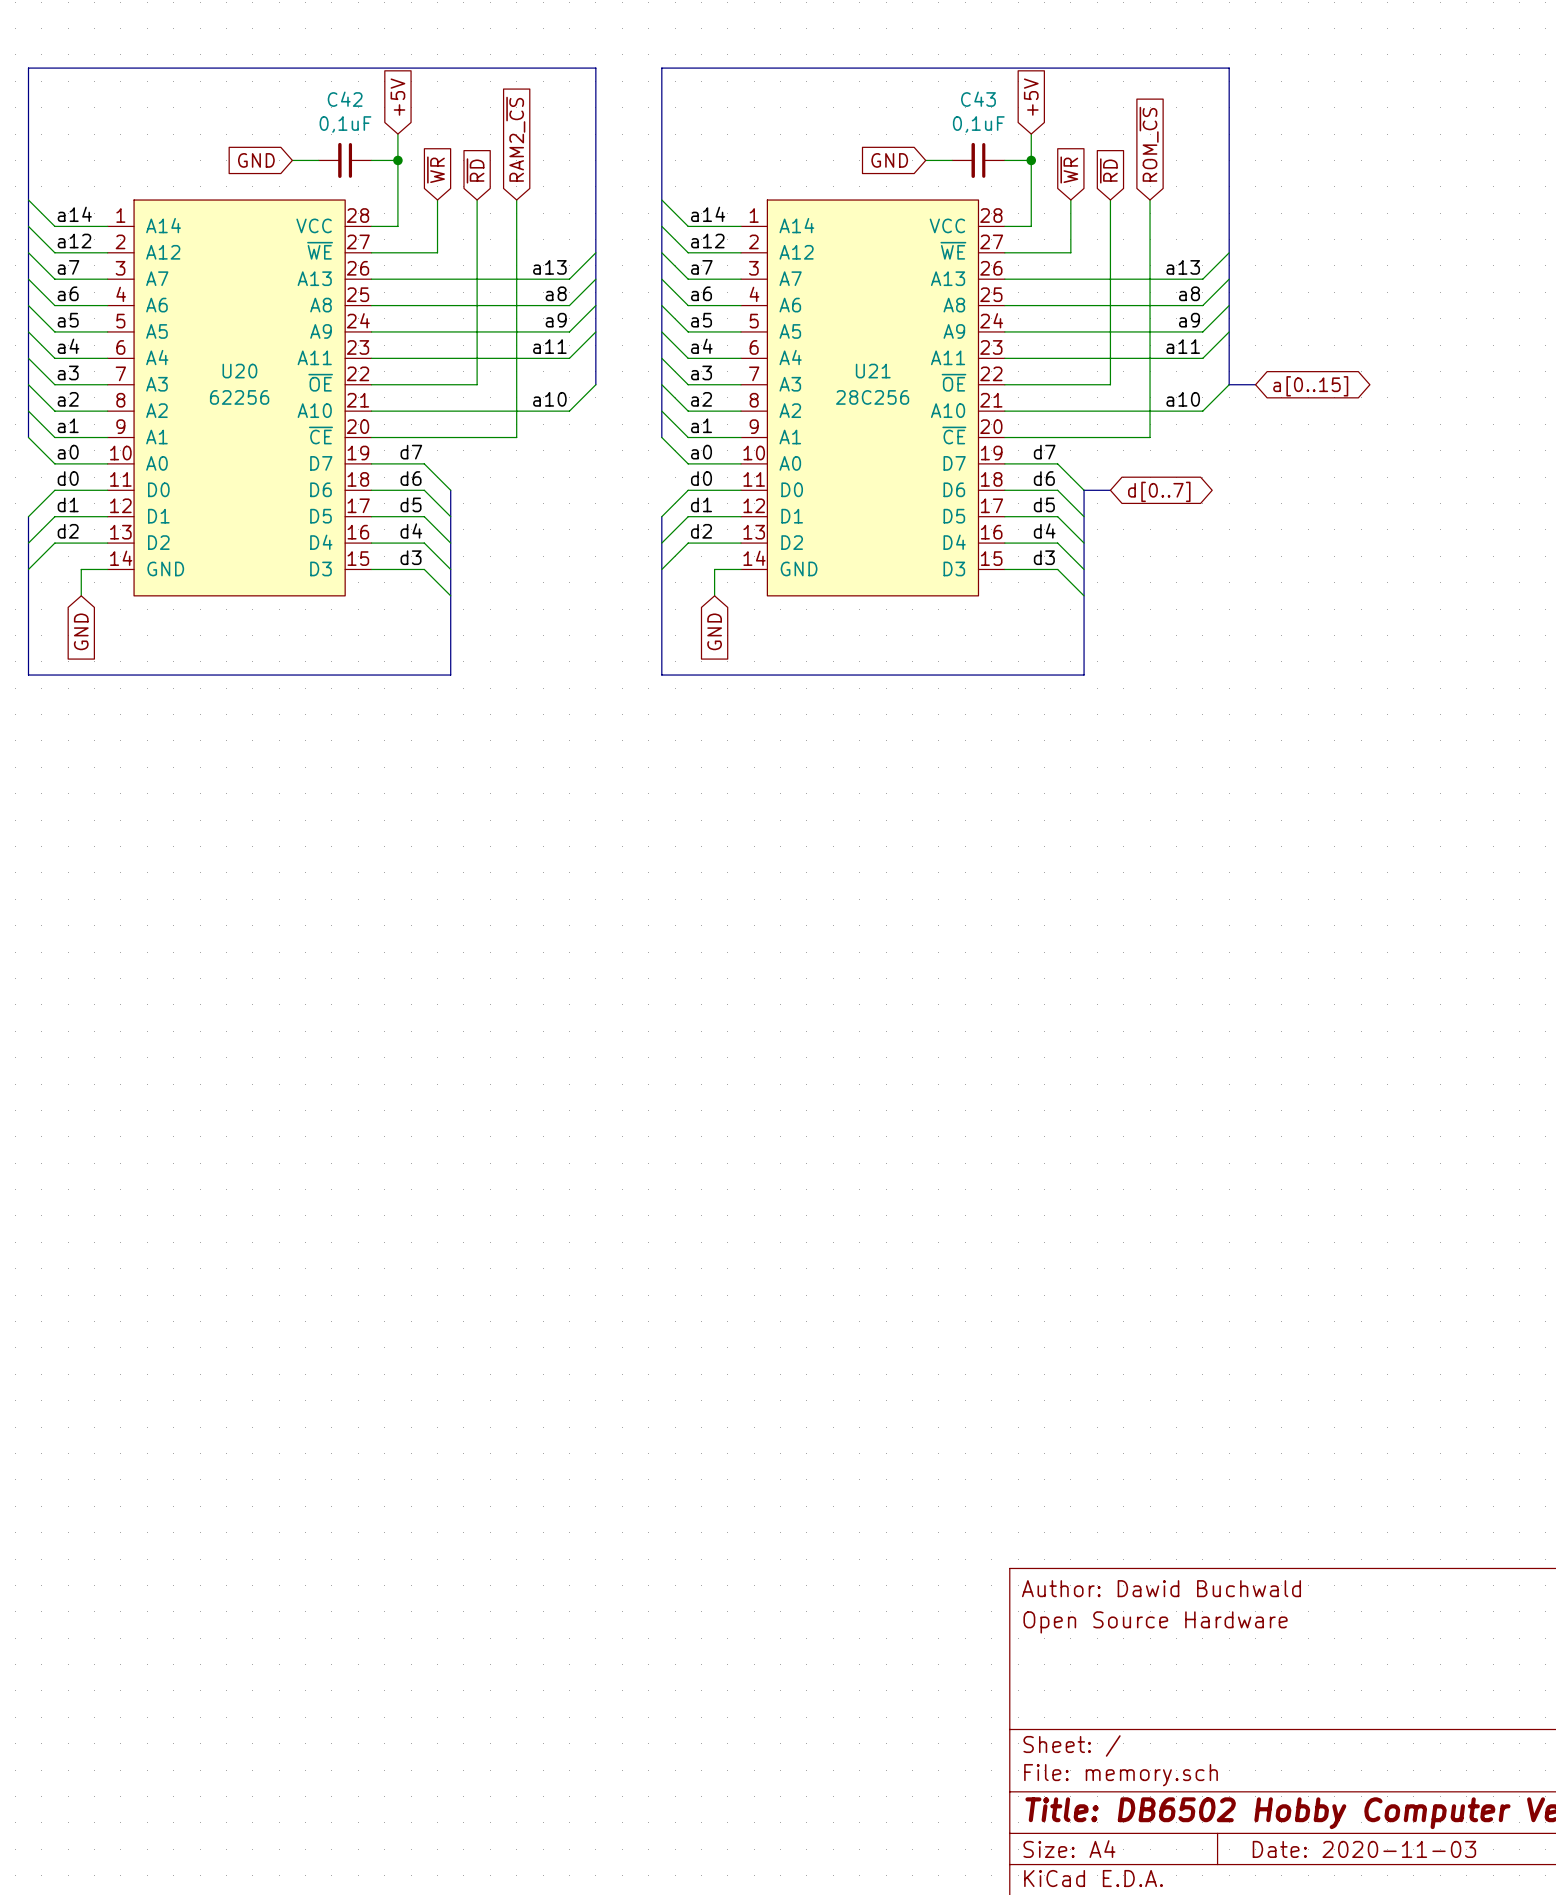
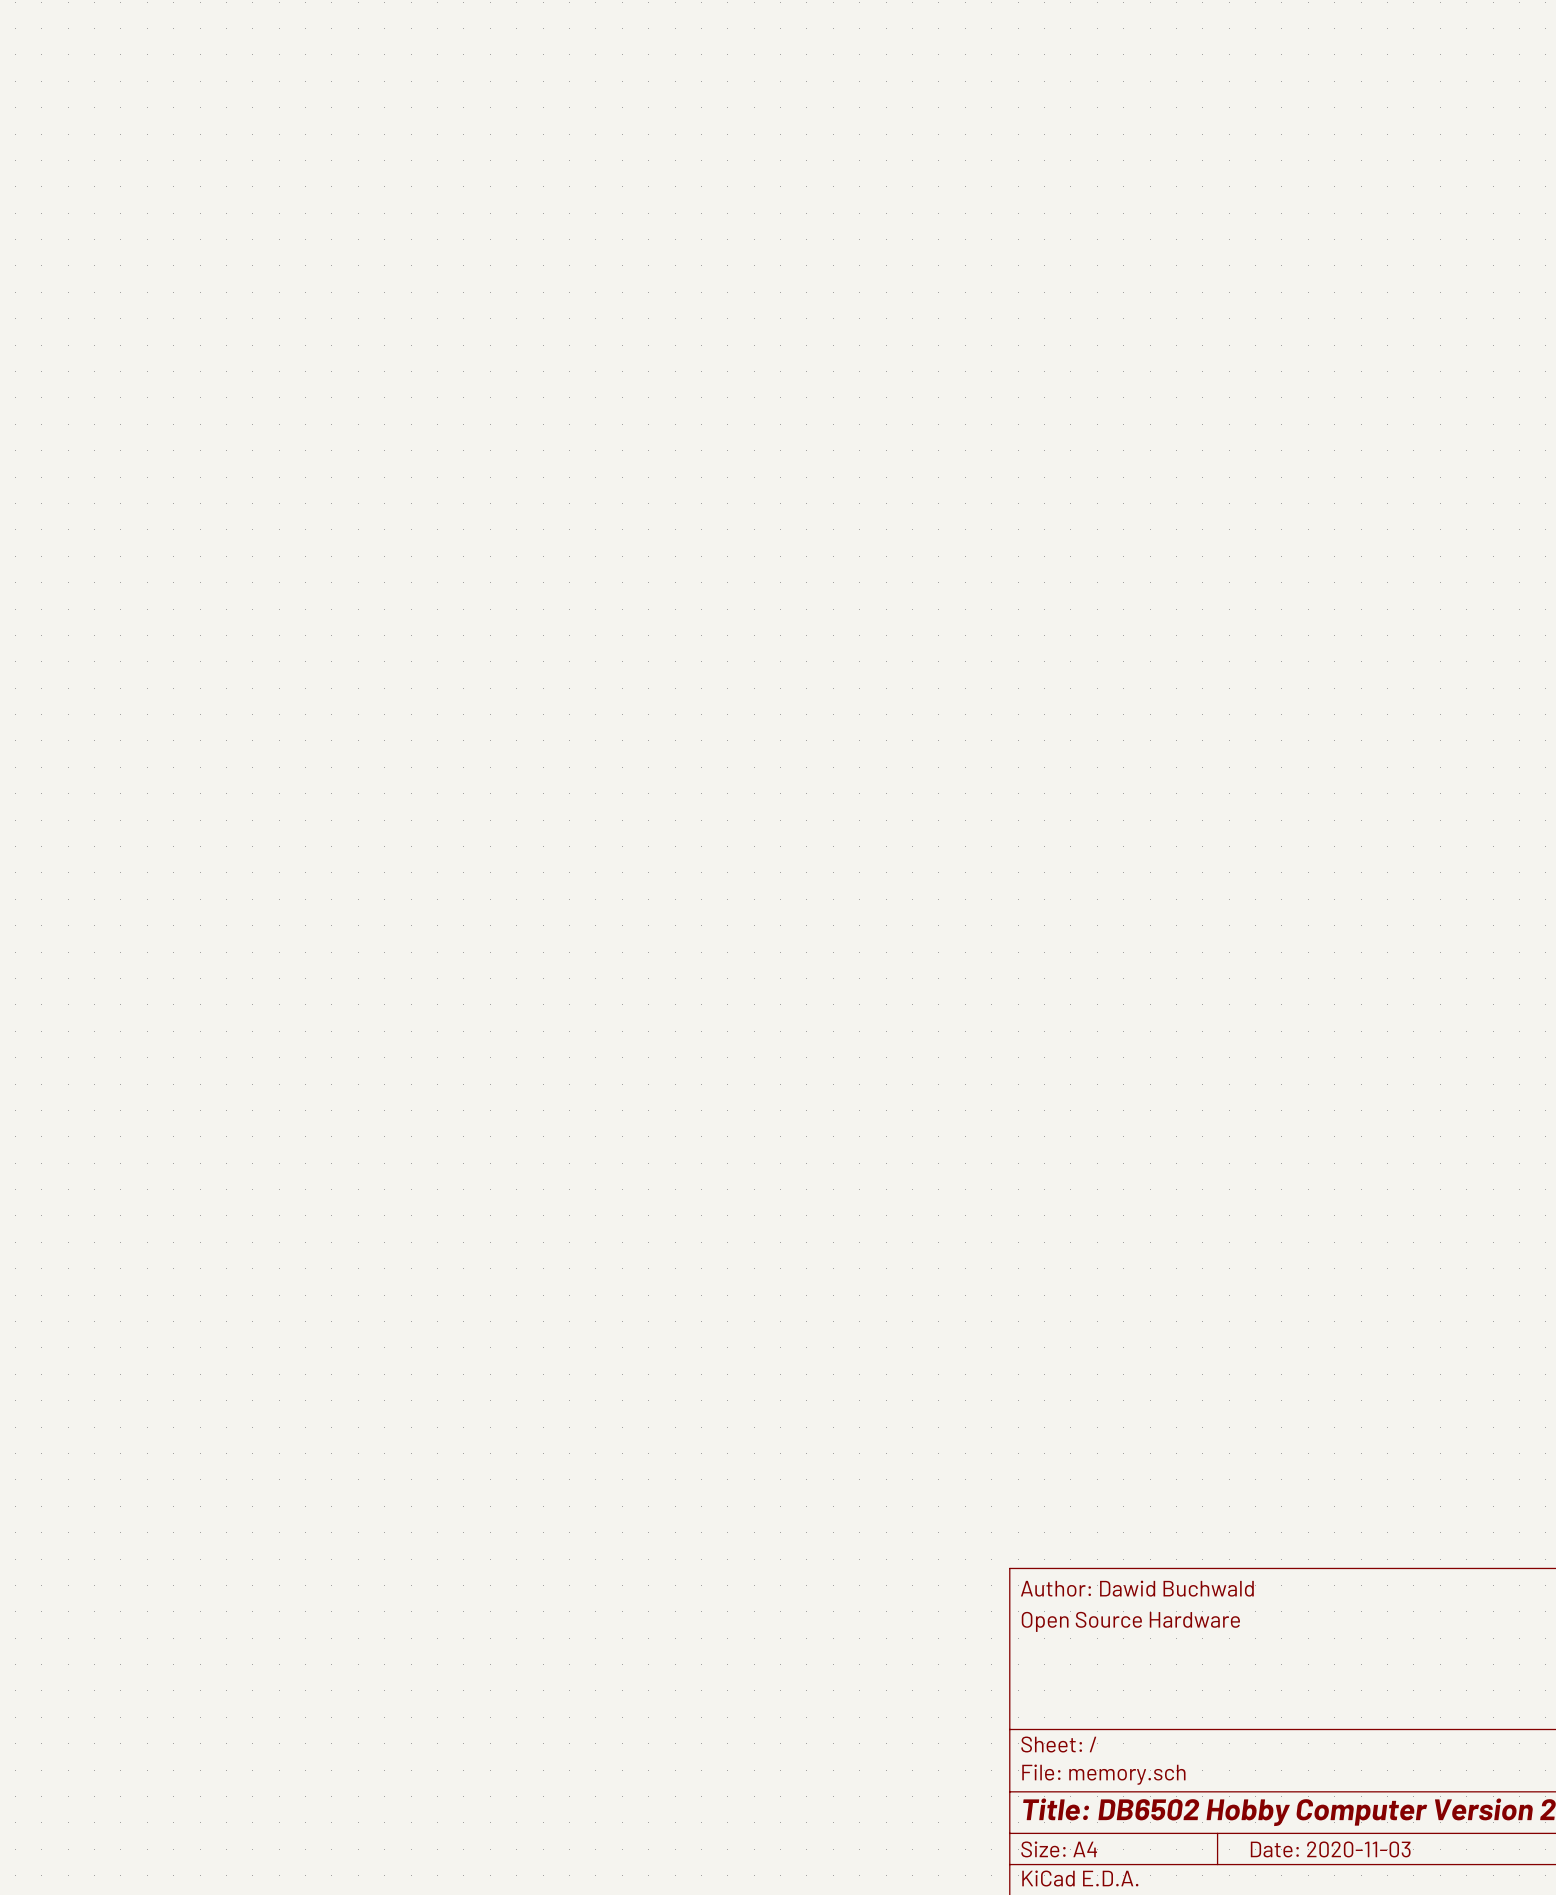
global label: +5V (397, 97) -> none
global label: +5V (1031, 97) -> none
wire: (397, 134) (397, 226) (371, 226) -> none
wire: (1031, 134) (1031, 226) (1004, 226) -> none
global label: RAM2_~{CS} (515, 139) -> none
global label: ROM_~{CS} (1149, 144) -> none
global label: GND (256, 160) -> none
wire: (292, 160) (318, 160) -> none
C42: 0,1uF (345, 160) -> none
wire: (371, 160) (397, 160) -> none
junction: (397, 160) -> none
global label: GND (889, 160) -> none
wire: (925, 160) (952, 160) -> none
C43: 0,1uF (978, 160) -> none
wire: (1004, 160) (1031, 160) -> none
junction: (1031, 160) -> none
global label: ~{WR} (436, 170) -> none
global label: ~{RD} (475, 170) -> none
global label: ~{WR} (1069, 170) -> none
global label: ~{RD} (1108, 170) -> none
wire: (28, 200) (54, 226) (107, 226) -> none
wire: (437, 200) (437, 252) (371, 252) -> none
wire: (477, 200) (477, 384) (371, 384) -> none
wire: (516, 200) (516, 437) (371, 437) -> none
wire: (661, 200) (688, 226) (740, 226) -> none
wire: (1070, 200) (1070, 252) (1004, 252) -> none
wire: (1110, 200) (1110, 384) (1004, 384) -> none
wire: (1150, 200) (1150, 437) (1004, 437) -> none
label: a14 (74, 214) -> none
label: a14 (708, 214) -> none
wire: (28, 226) (54, 252) (107, 252) -> none
wire: (661, 226) (688, 252) (740, 252) -> none
label: a12 (74, 241) -> none
label: a12 (707, 241) -> none
wire: (28, 252) (54, 279) (107, 279) -> none
wire: (595, 252) (569, 279) (371, 279) -> none
wire: (661, 252) (688, 279) (740, 279) -> none
wire: (1229, 252) (1202, 279) (1004, 279) -> none
label: a7 (68, 267) -> none
label: a13 (549, 267) -> none
label: a7 (701, 267) -> none
label: a13 (1183, 267) -> none
wire: (28, 279) (54, 305) (107, 305) -> none
wire: (595, 279) (569, 305) (371, 305) -> none
wire: (661, 279) (688, 305) (740, 305) -> none
wire: (1229, 279) (1202, 305) (1004, 305) -> none
label: a6 (68, 293) -> none
label: a8 (556, 293) -> none
label: a6 (701, 293) -> none
label: a8 (1189, 293) -> none
wire: (28, 305) (54, 331) (107, 331) -> none
wire: (595, 305) (569, 331) (371, 331) -> none
wire: (661, 305) (688, 331) (740, 331) -> none
wire: (1229, 305) (1202, 331) (1004, 331) -> none
label: a5 (68, 320) -> none
label: a9 (556, 320) -> none
label: a5 (701, 320) -> none
label: a9 (1189, 320) -> none
wire: (28, 331) (54, 358) (107, 358) -> none
wire: (595, 331) (569, 358) (371, 358) -> none
wire: (661, 331) (688, 358) (740, 358) -> none
wire: (1229, 331) (1202, 358) (1004, 358) -> none
label: a4 (68, 346) -> none
label: a11 (549, 346) -> none
label: a4 (701, 346) -> none
label: a11 (1183, 346) -> none
wire: (28, 358) (54, 384) (107, 384) -> none
wire: (661, 358) (688, 384) (740, 384) -> none
label: a3 (68, 372) -> none
label: a3 (701, 372) -> none
wire: (28, 384) (54, 411) (107, 411) -> none
wire: (595, 384) (569, 411) (371, 411) -> none
bus: (595, 384) (595, 68) (28, 68) (28, 437) -> none
wire: (661, 384) (688, 411) (740, 411) -> none
wire: (1229, 384) (1202, 411) (1004, 411) -> none
bus: (1255, 384) (1229, 384) (1229, 68) (661, 68) (661, 437) -> none
global label: a[0..15] (1310, 386) -> none
U20: 62256 (239, 397) -> none
U21: 28C256 (872, 397) -> none
label: a2 (68, 399) -> none
label: a10 (549, 399) -> none
label: a2 (701, 399) -> none
label: a10 (1183, 399) -> none
wire: (28, 411) (54, 437) (107, 437) -> none
wire: (661, 411) (688, 437) (740, 437) -> none
label: a1 (68, 425) -> none
label: a1 (701, 425) -> none
wire: (28, 437) (54, 463) (107, 463) -> none
wire: (661, 437) (688, 463) (740, 463) -> none
label: a0 (68, 452) -> none
label: d7 (411, 452) -> none
label: a0 (701, 452) -> none
label: d7 (1044, 452) -> none
wire: (371, 463) (424, 463) (450, 490) -> none
wire: (1004, 463) (1057, 463) (1084, 490) -> none
label: d0 (68, 478) -> none
label: d6 (411, 478) -> none
label: d0 (701, 478) -> none
label: d6 (1044, 478) -> none
wire: (107, 490) (54, 490) (28, 516) -> none
wire: (371, 490) (424, 490) (450, 516) -> none
bus: (450, 490) (450, 675) (28, 675) (28, 516) -> none
wire: (740, 490) (688, 490) (661, 516) -> none
wire: (1004, 490) (1057, 490) (1084, 516) -> none
bus: (1110, 490) (1084, 490) (1084, 675) (661, 675) (661, 516) -> none
global label: d[0..7] (1159, 491) -> none
label: d1 (68, 504) -> none
label: d5 (411, 504) -> none
label: d1 (701, 504) -> none
label: d5 (1044, 504) -> none
wire: (107, 516) (54, 516) (28, 543) -> none
wire: (371, 516) (424, 516) (450, 543) -> none
wire: (740, 516) (688, 516) (661, 543) -> none
wire: (1004, 516) (1057, 516) (1084, 543) -> none
label: d4 (411, 530) -> none
label: d4 (1044, 530) -> none
label: d2 (68, 531) -> none
label: d2 (701, 531) -> none
wire: (107, 543) (54, 543) (28, 569) -> none
wire: (371, 543) (424, 543) (450, 569) -> none
wire: (740, 543) (688, 543) (661, 569) -> none
wire: (1004, 543) (1057, 543) (1084, 569) -> none
label: d3 (411, 557) -> none
label: d3 (1044, 557) -> none
wire: (107, 569) (81, 569) (81, 595) -> none
wire: (371, 569) (424, 569) (450, 595) -> none
wire: (740, 569) (714, 569) (714, 595) -> none
wire: (1004, 569) (1057, 569) (1084, 595) -> none
global label: GND (81, 631) -> none
global label: GND (714, 631) -> none

